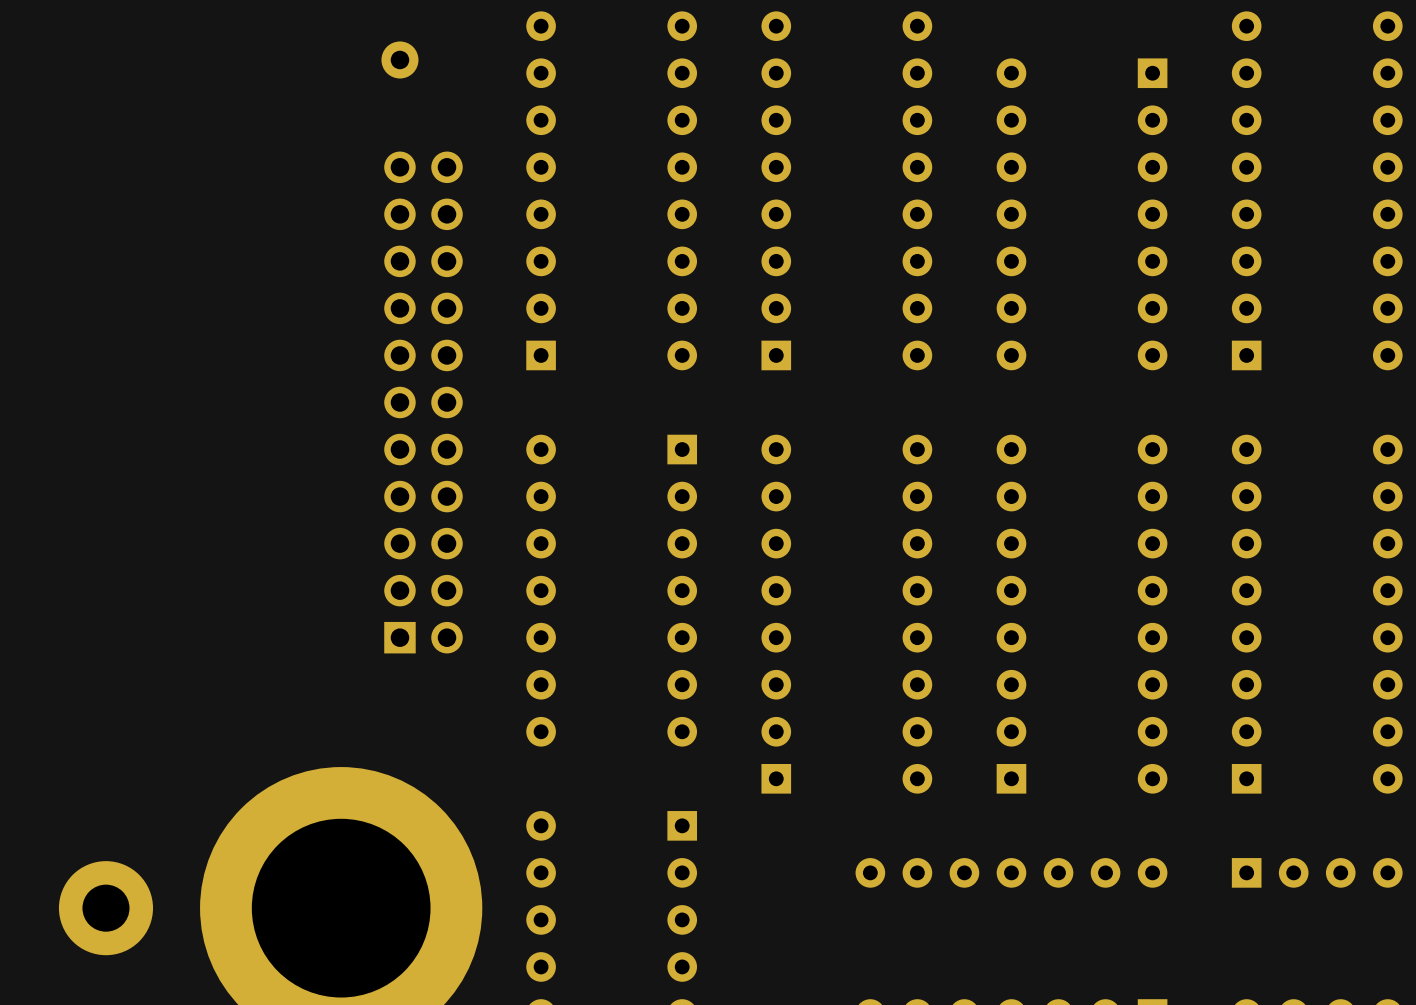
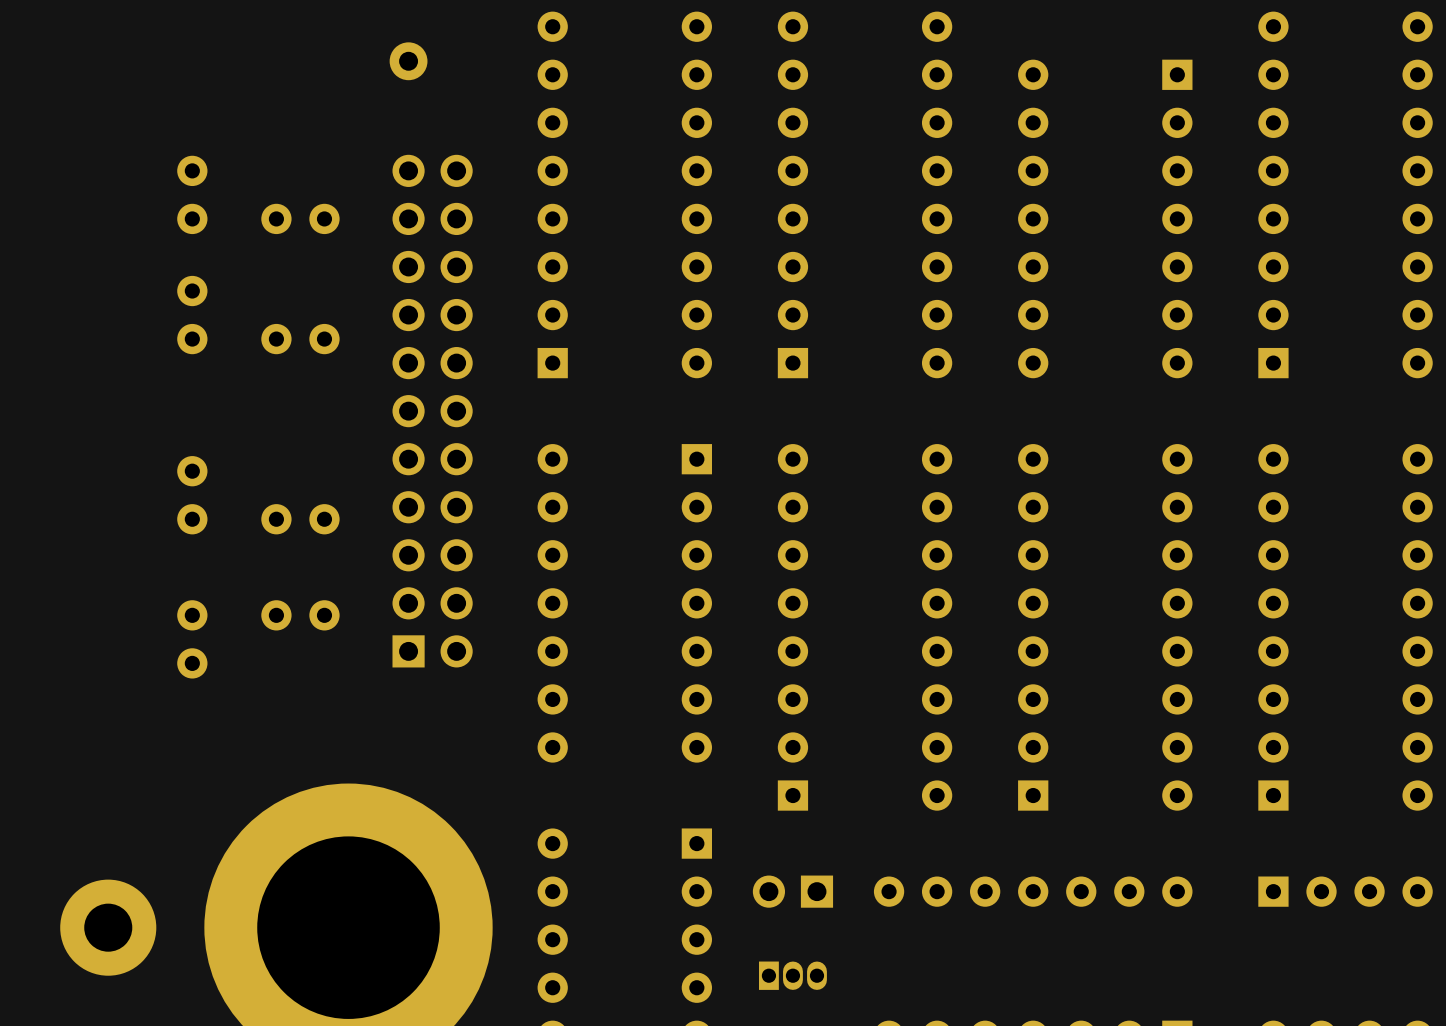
part: none -> (192, 194)
part: none -> (300, 218)
part: none -> (192, 315)
part: none -> (300, 339)
part: none -> (192, 495)
part: none -> (300, 519)
part: none -> (300, 615)
part: none -> (192, 639)
part: none -> (792, 891)
part: none -> (792, 975)

